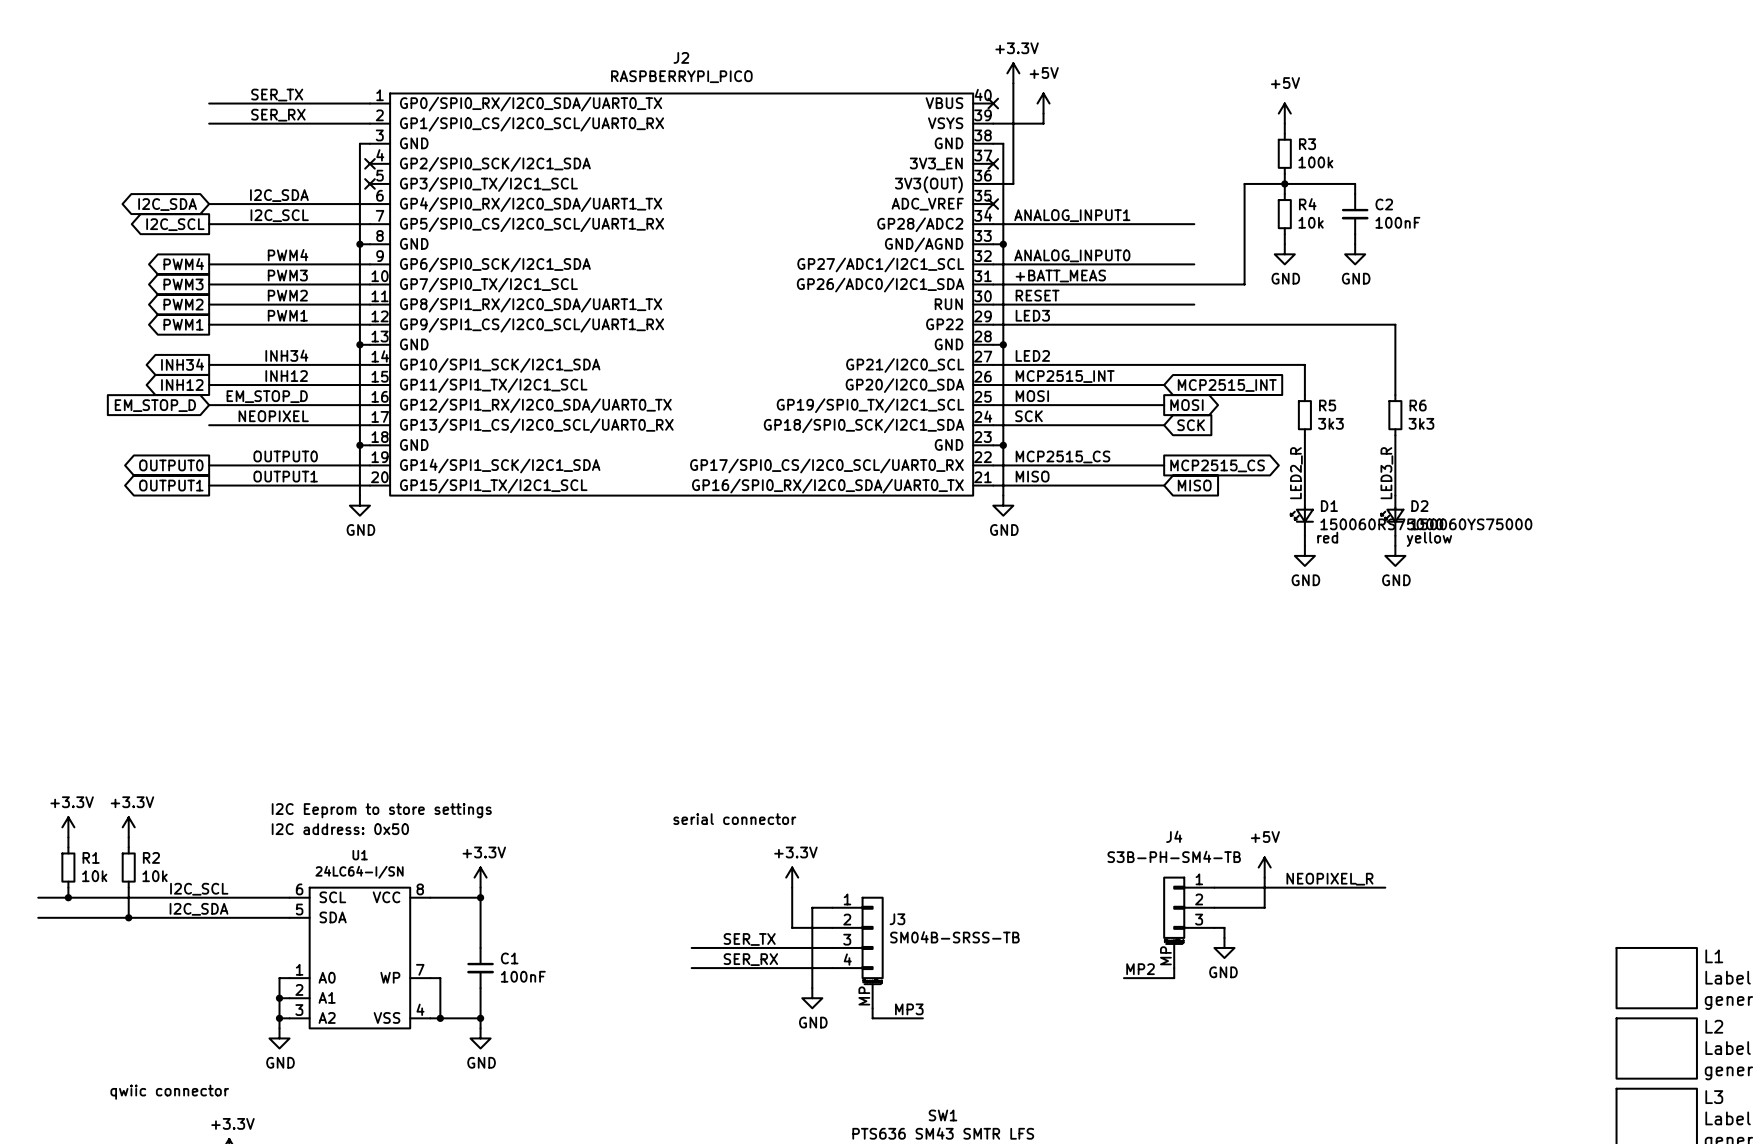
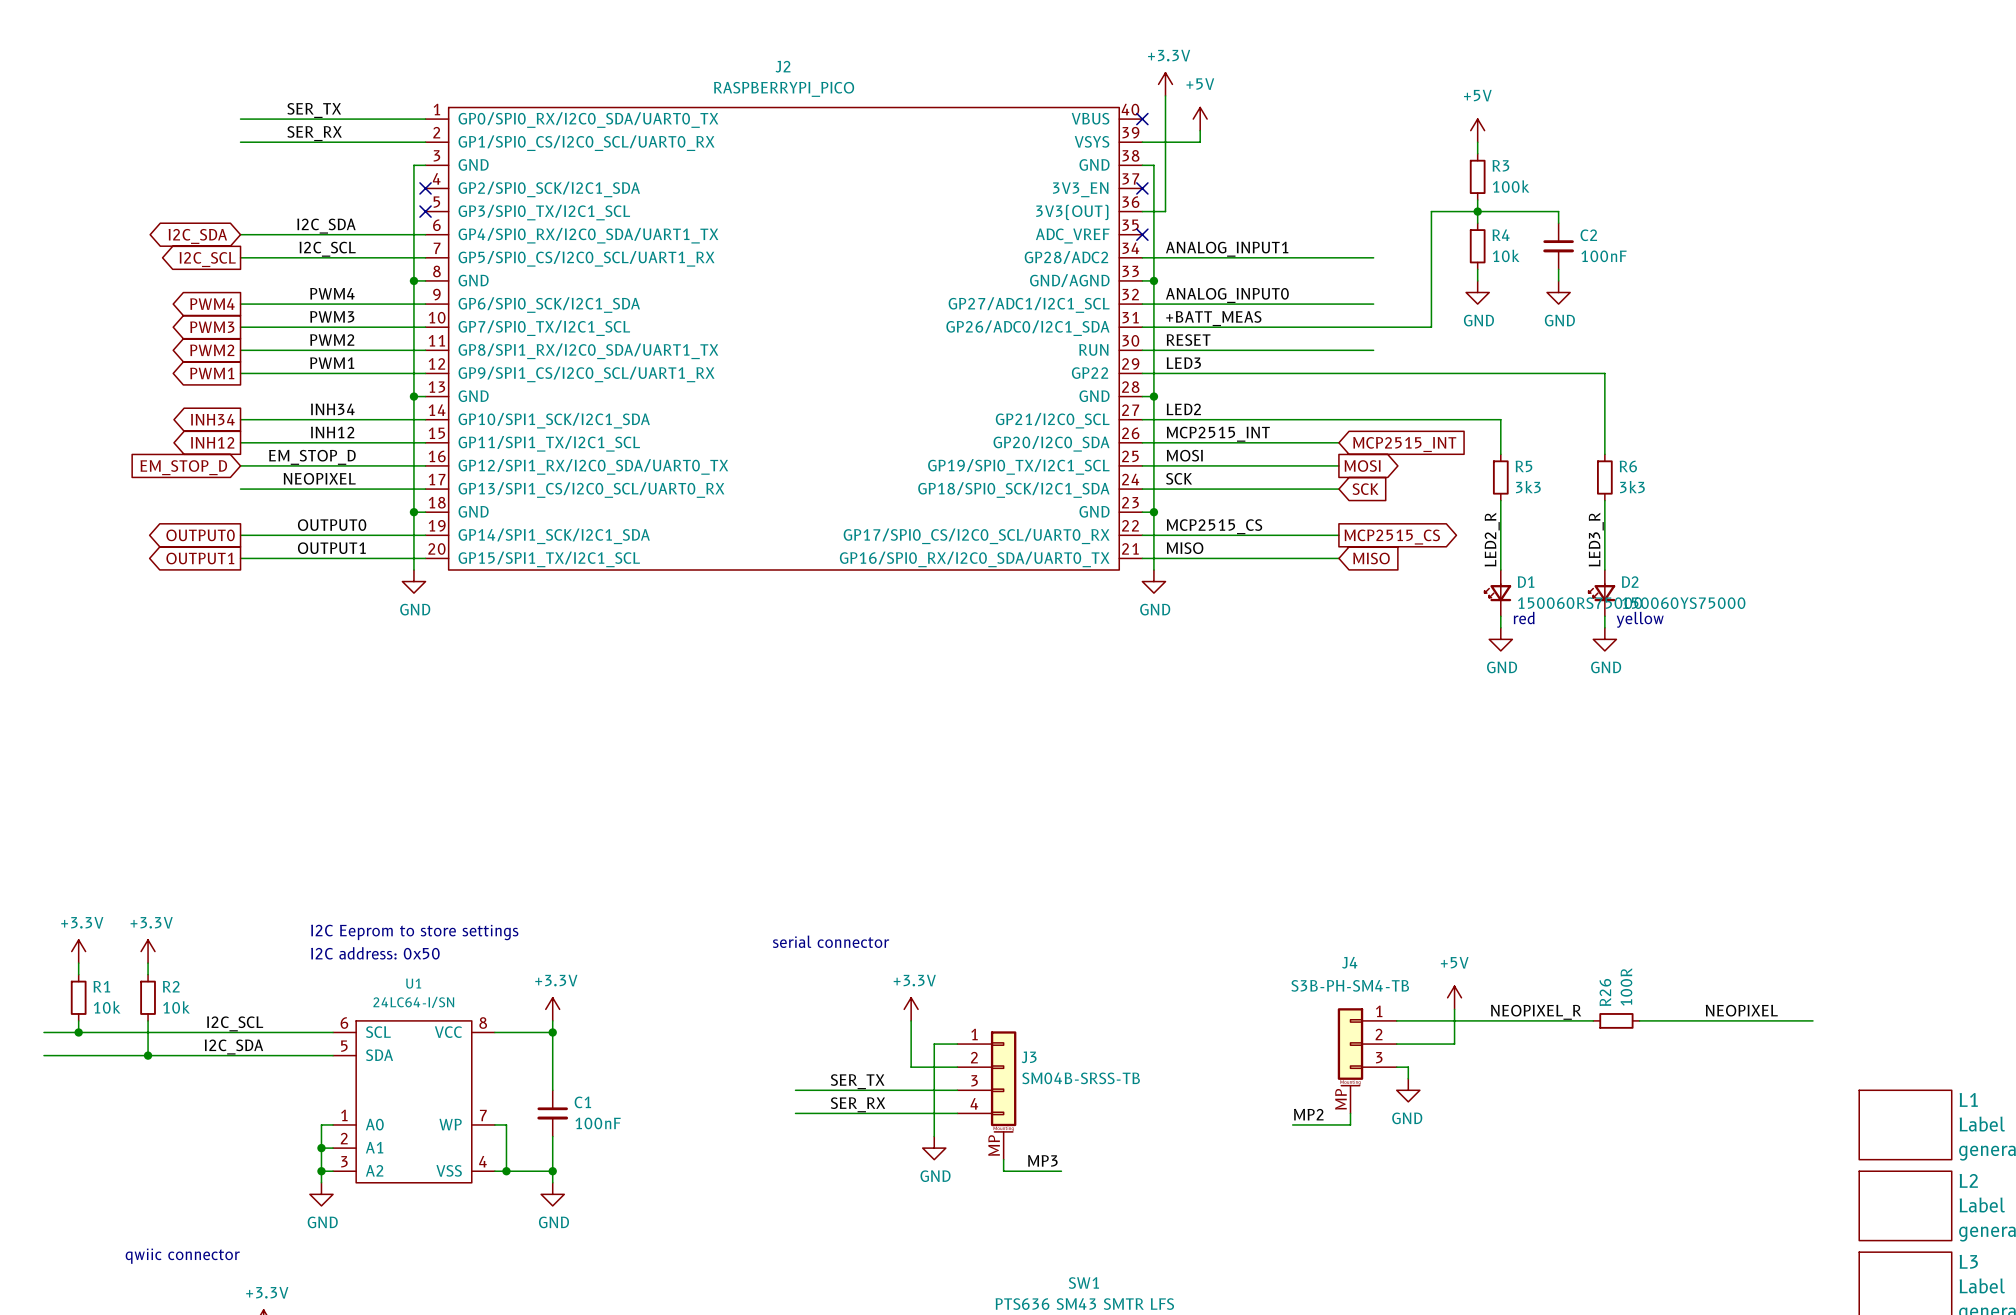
label: none -> NEOPIXEL (1741, 1010)
R26: none -> 100R (1616, 1020)
wire: none -> (1639, 1020) (1812, 1020)

